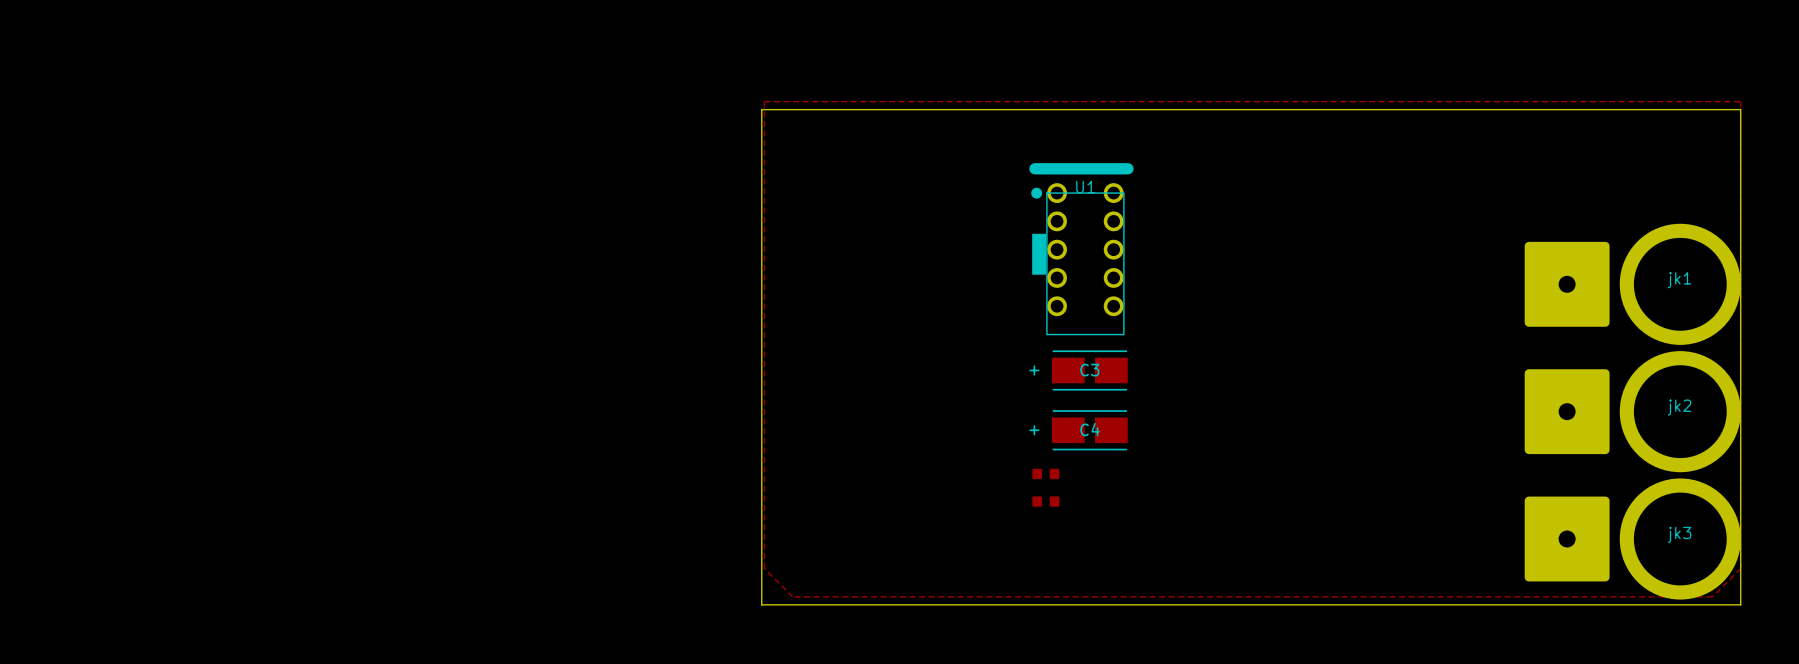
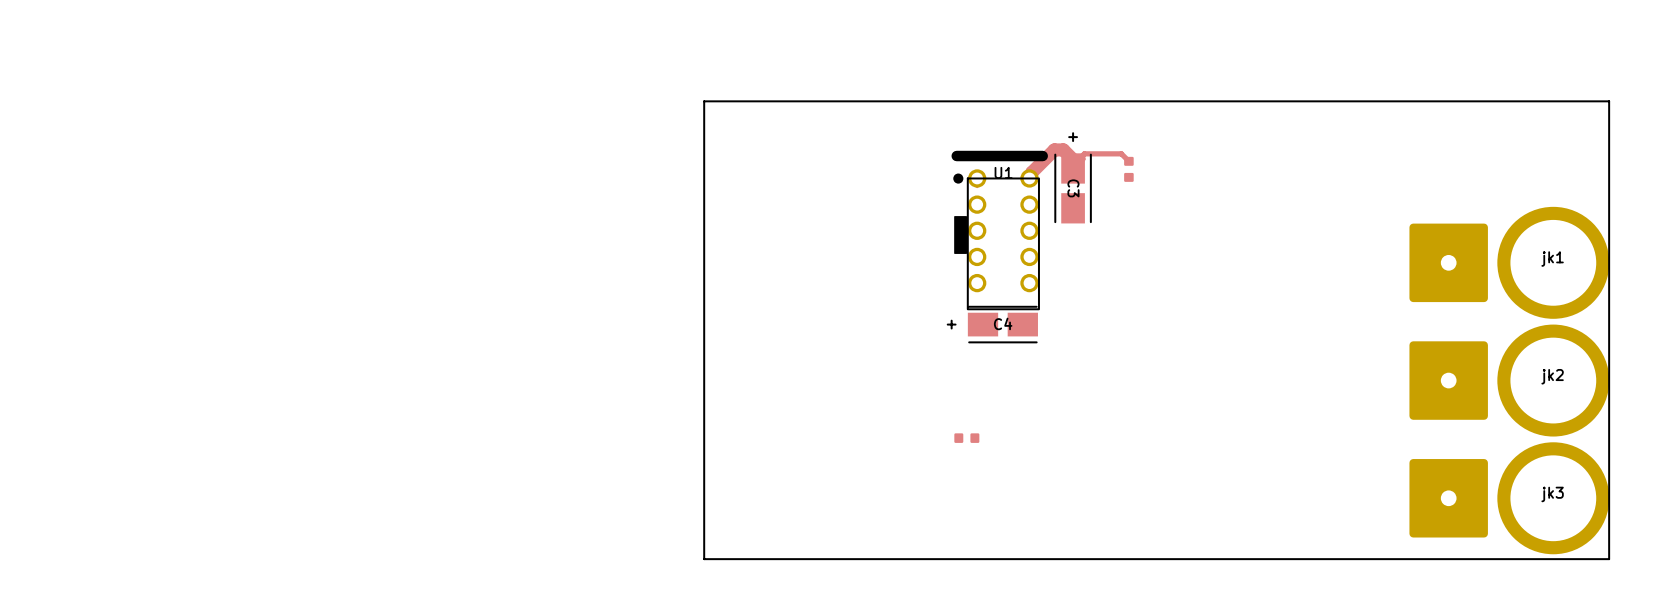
zone outline: (764, 101) (1740, 101) (1740, 568) (1712, 596) (792, 596) (764, 568) (764, 101) -> none
track: none -> (1128, 161) (1121, 153) (1084, 153) (1073, 165) (1073, 168)
track: none -> (1073, 168) (1073, 159) (1063, 149) (1054, 149) (1031, 172) (1029, 178)
part: none -> (1128, 169)
C3 rotation: 0° (1078, 370) -> 90° clockwise (1073, 177)
C3 position: (1078, 370) -> (1073, 177)
C4 position: (1078, 430) -> (992, 324)
part: (1045, 501) -> none

